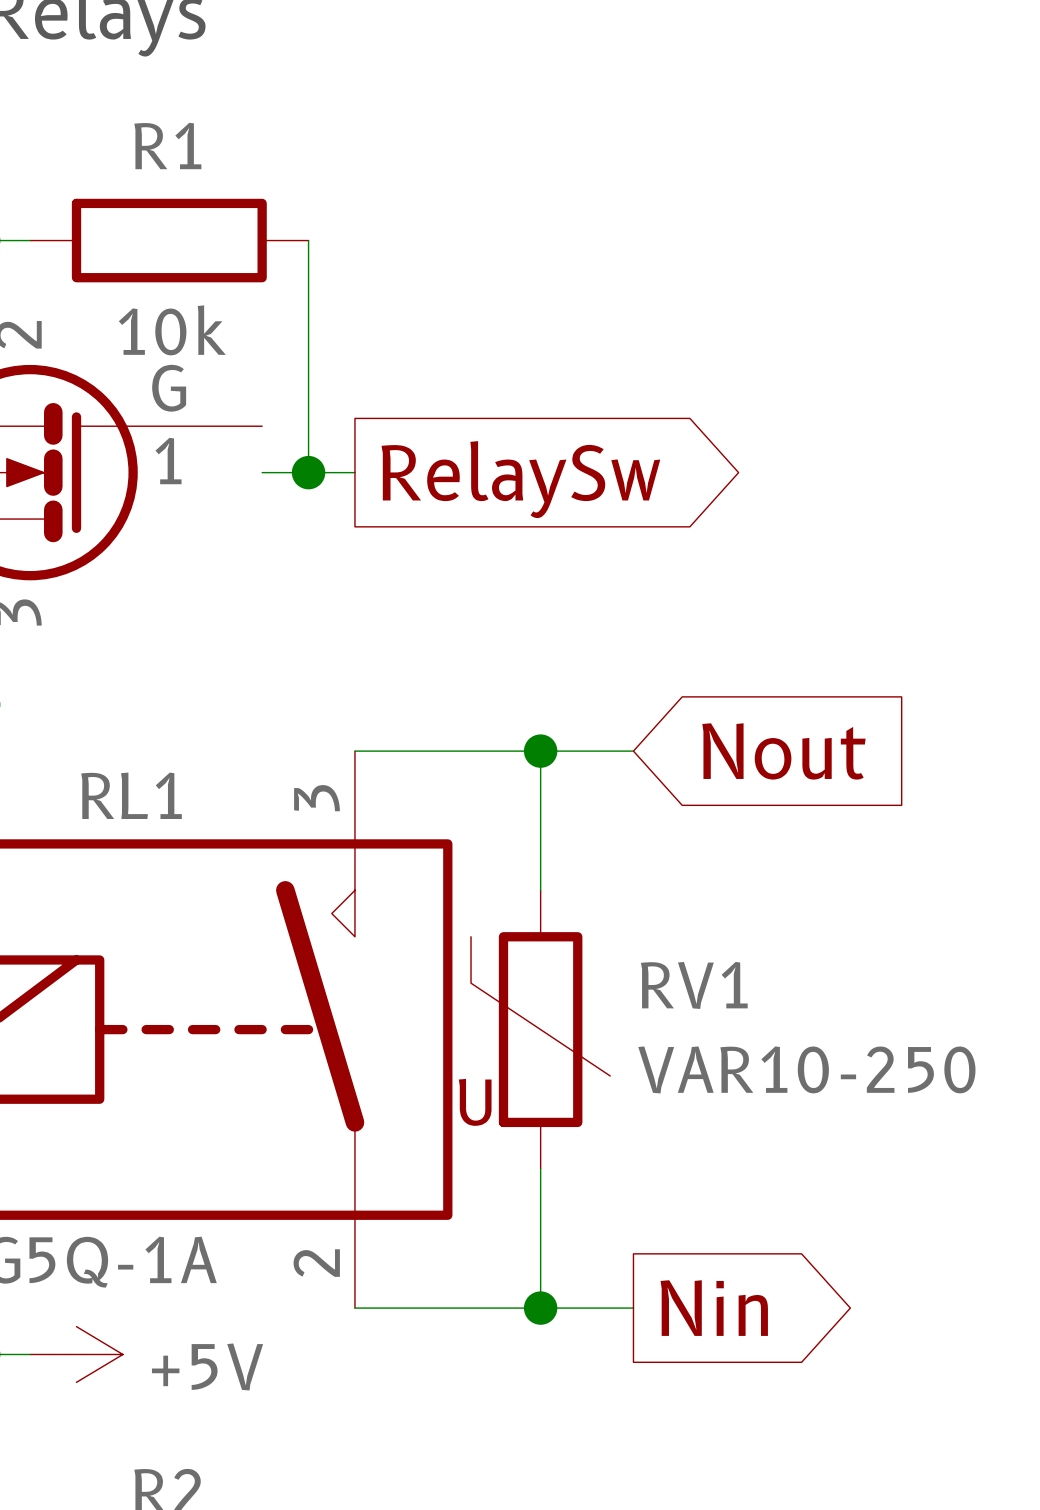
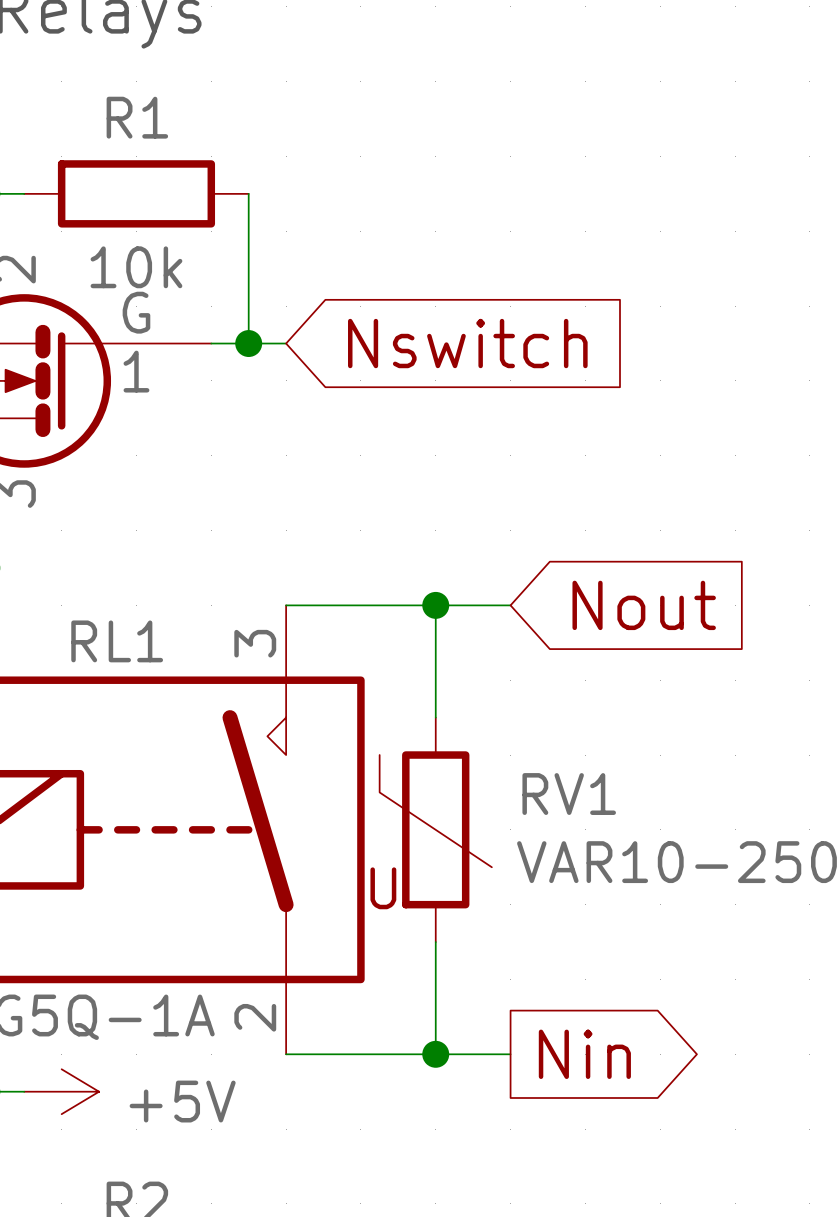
global label: none -> Nswitch (467, 343)
wire: (308, 426) (308, 472) -> none
wire: (262, 472) (354, 472) -> (211, 343) (286, 343)
junction position: (308, 472) -> (248, 343)
global label: RelaySw (520, 479) -> none

